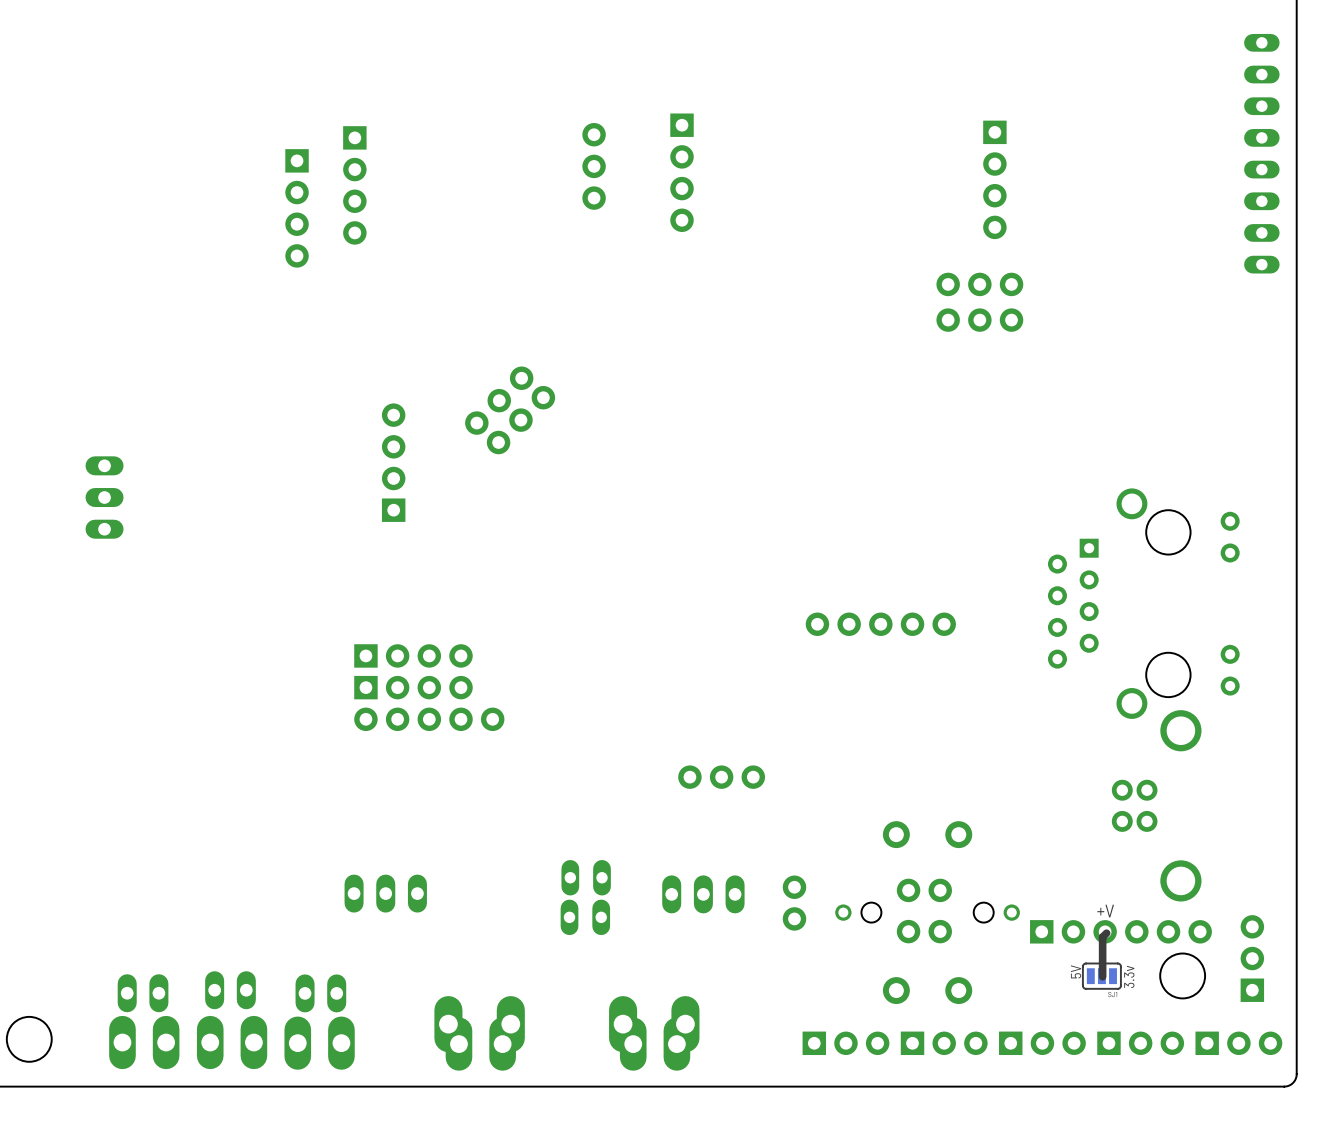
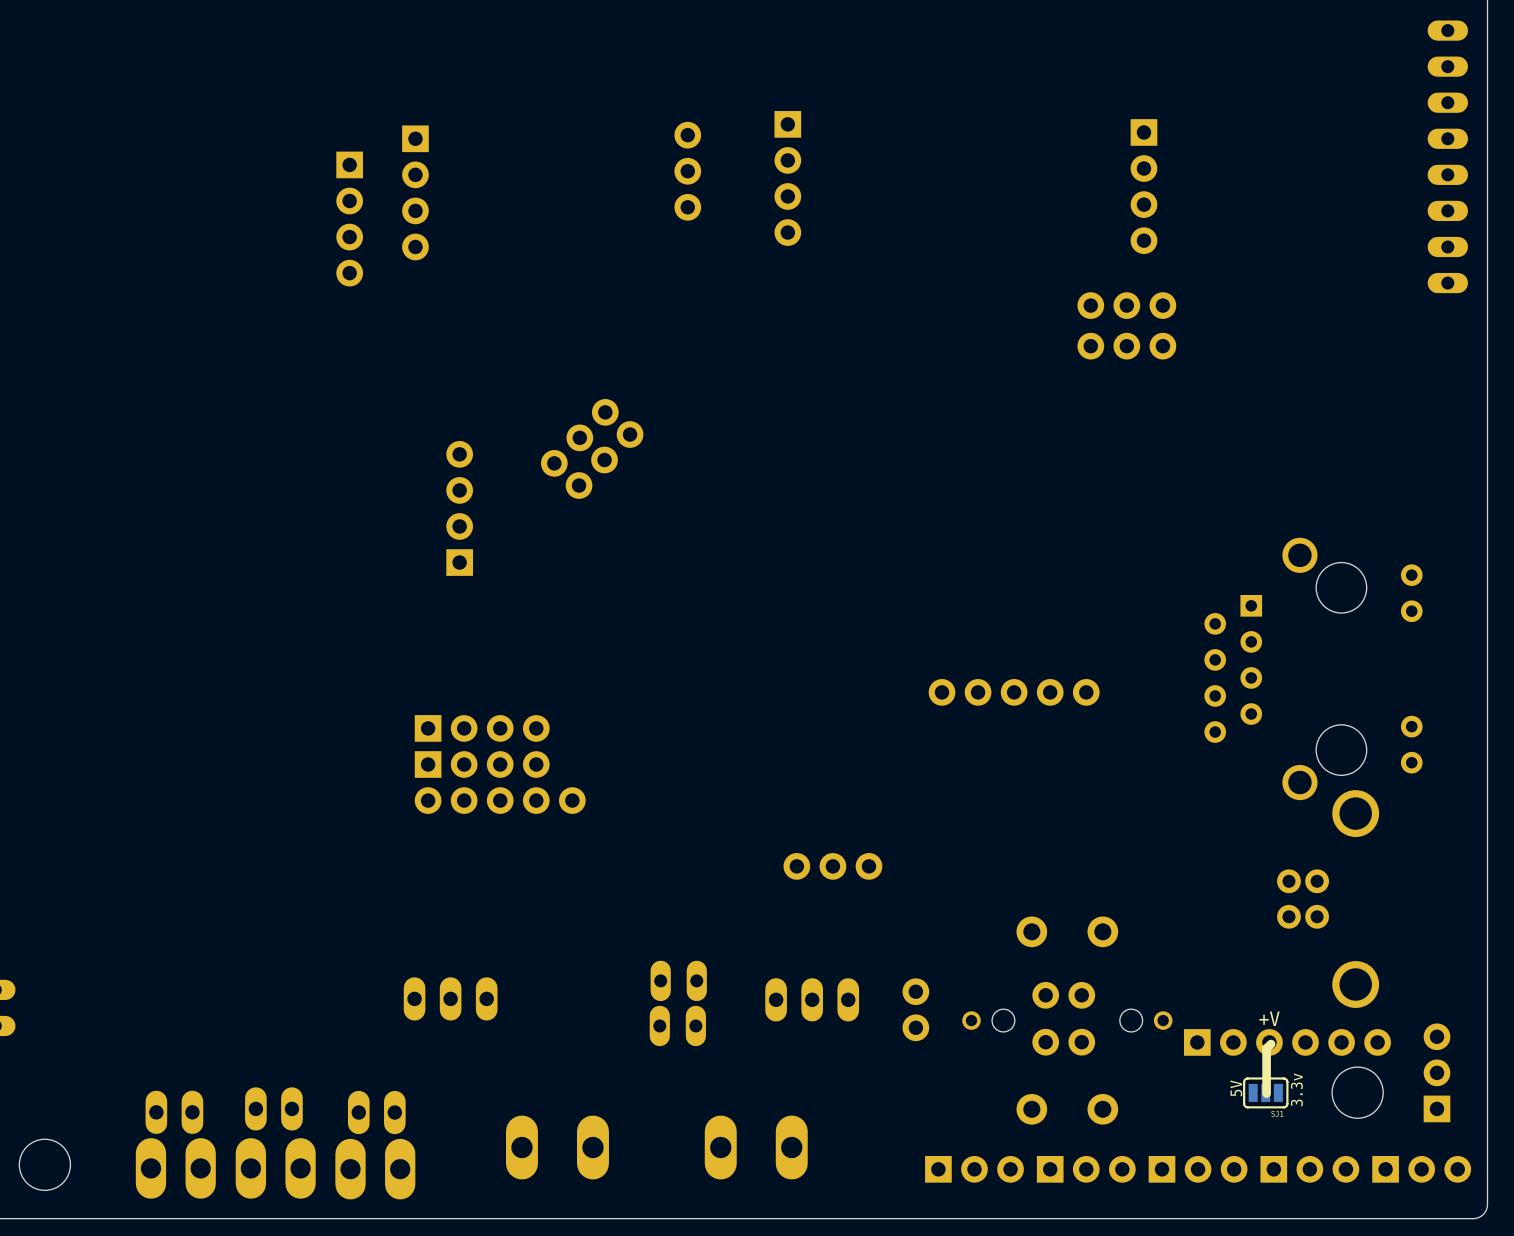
part: (104, 497) -> none
part: (480, 1044) -> none
part: (655, 1044) -> none

